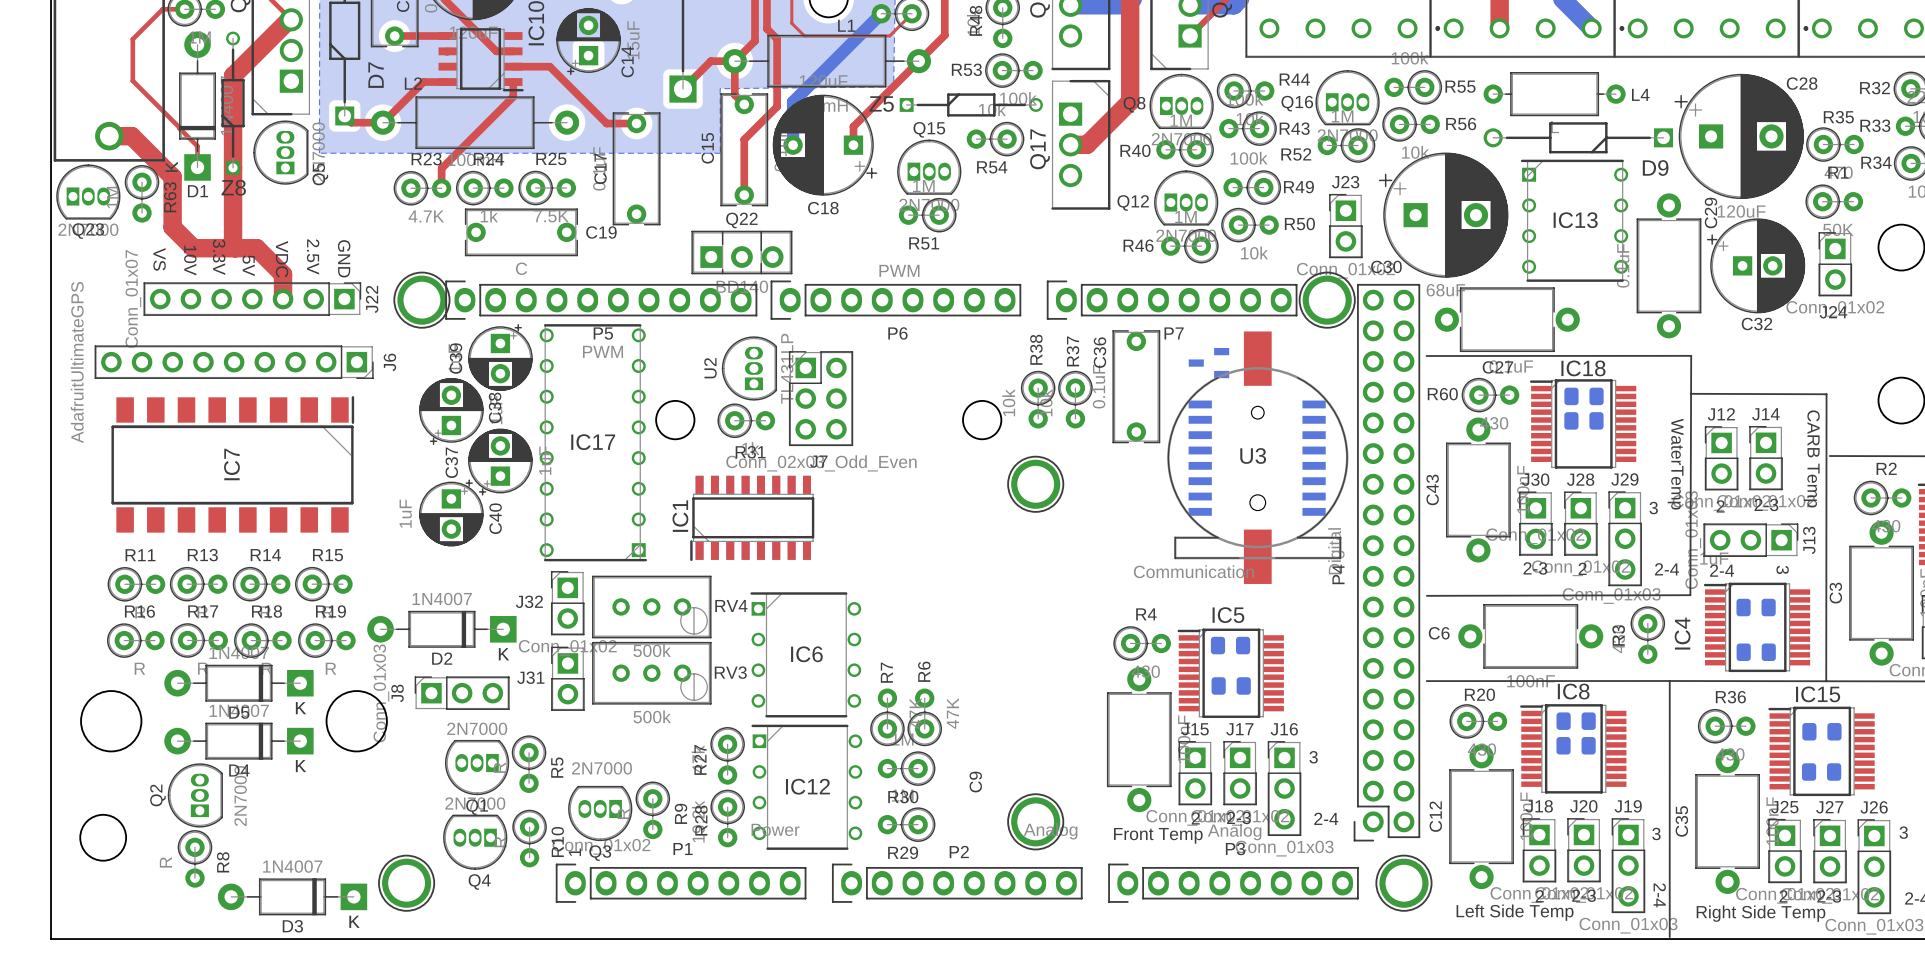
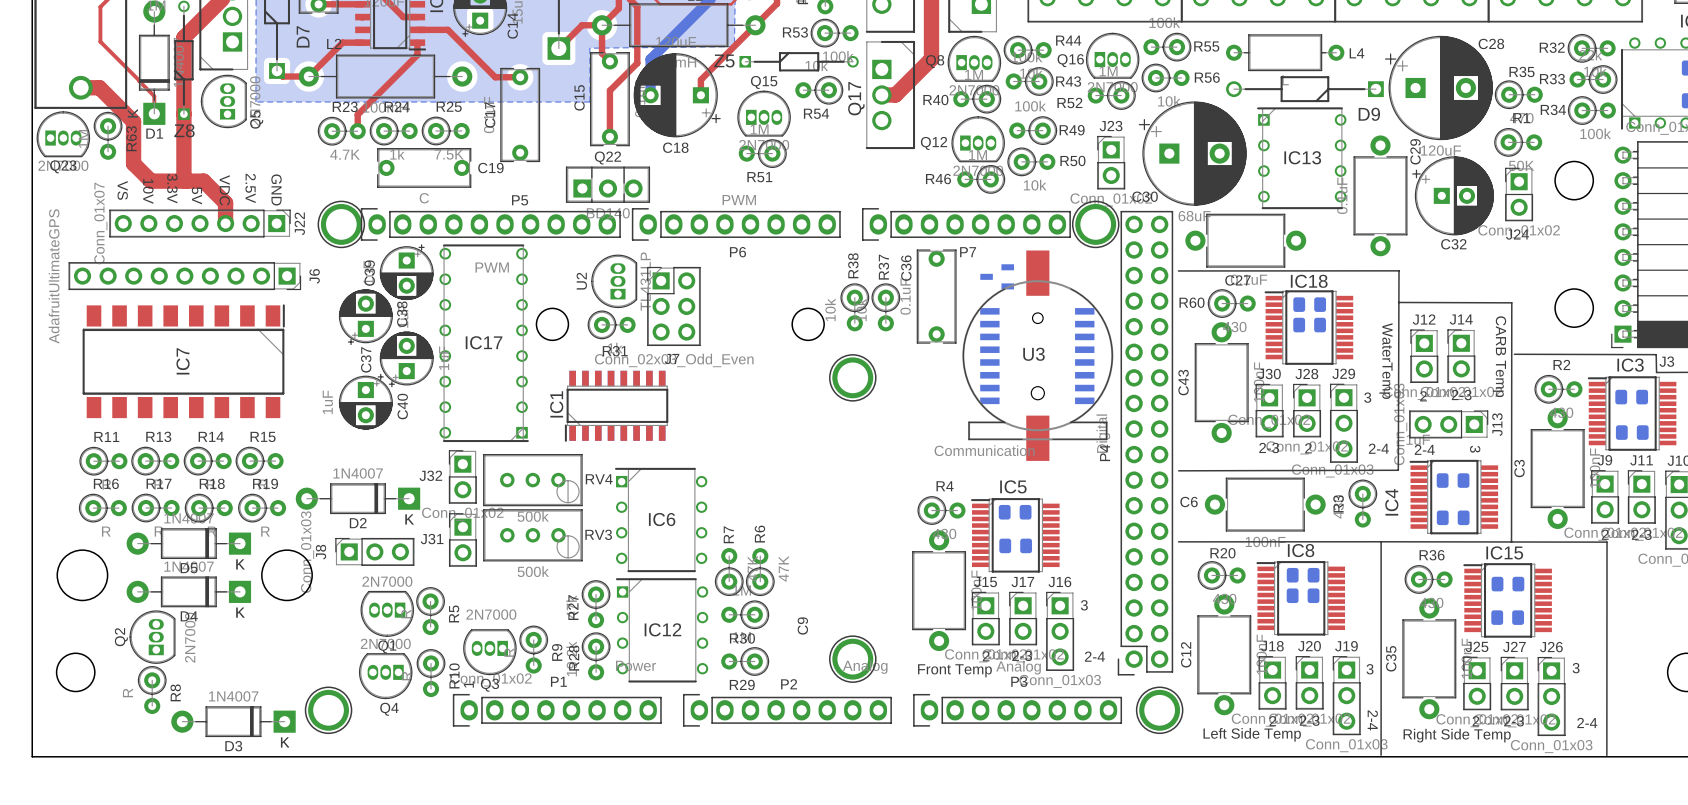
P5 name position: P5 (603, 333) -> P5 (520, 200)

